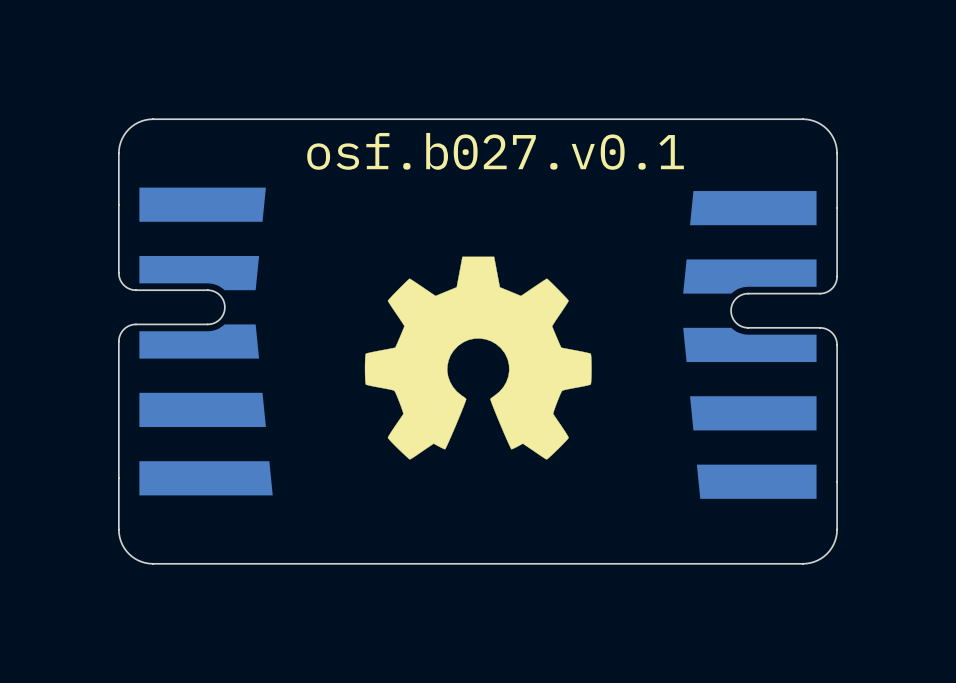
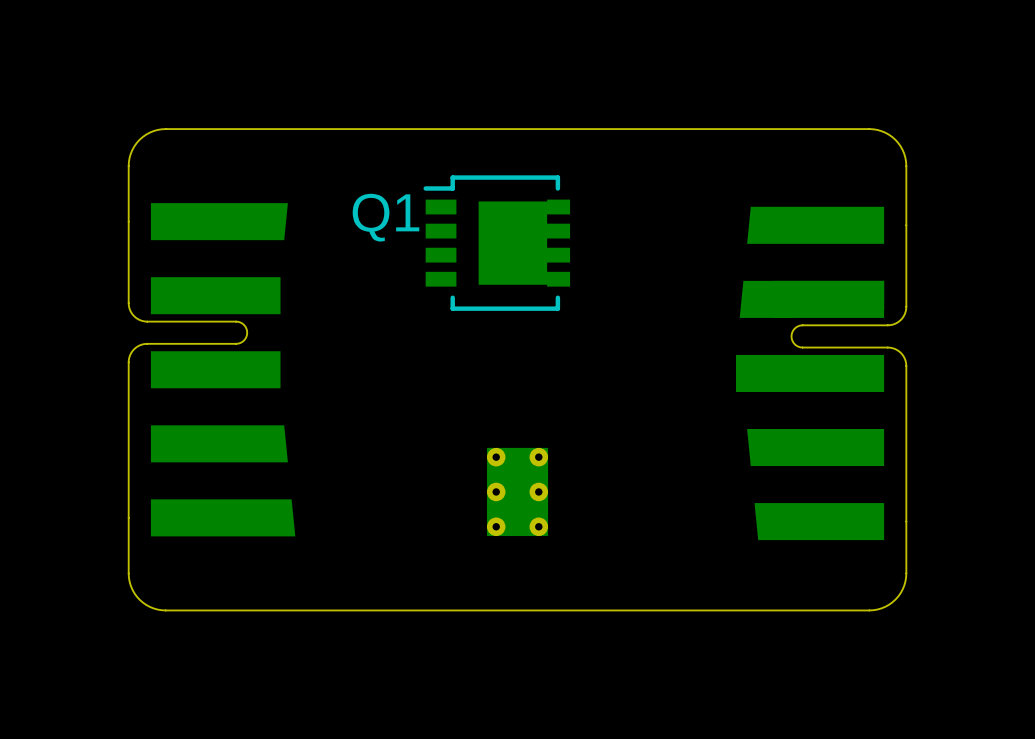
text: osf.b027.v0.1 (495, 151) -> none
part footprint: [118, 187, 273, 496] -> [127, 203, 296, 537]
part footprint: [683, 191, 838, 499] -> [735, 206, 908, 541]
Q1: none -> (496, 243)
drawing: [364, 256, 592, 460] -> none
part: none -> (517, 491)

